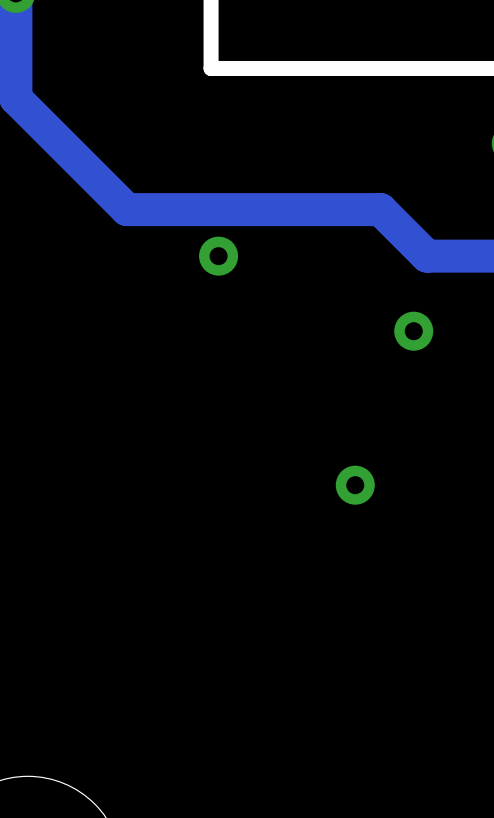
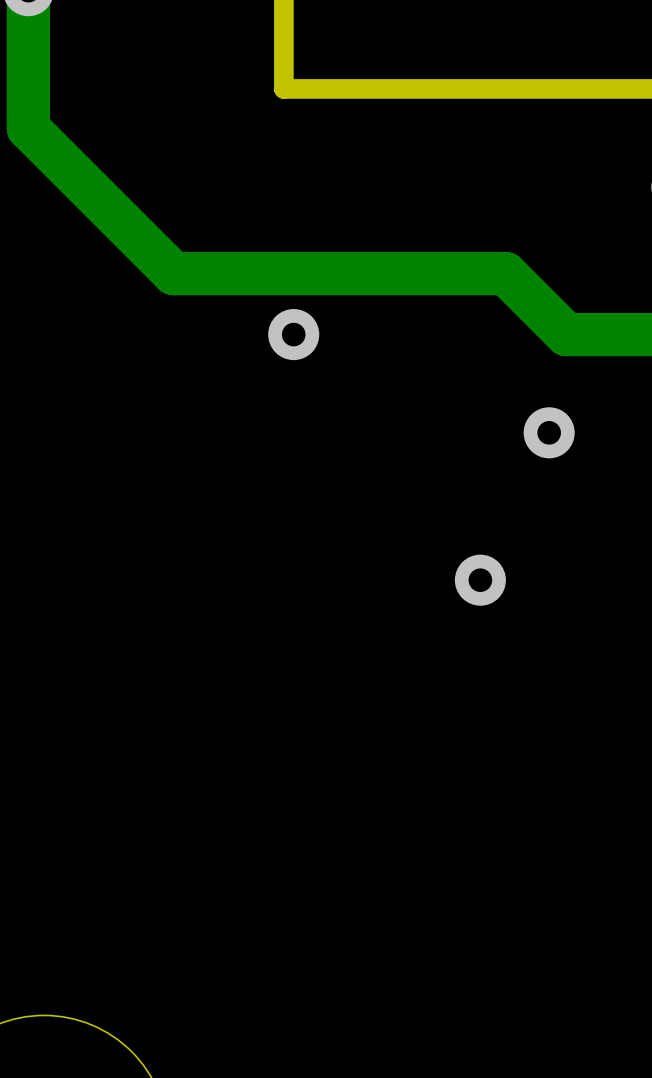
via position: (355, 485) -> (480, 580)

